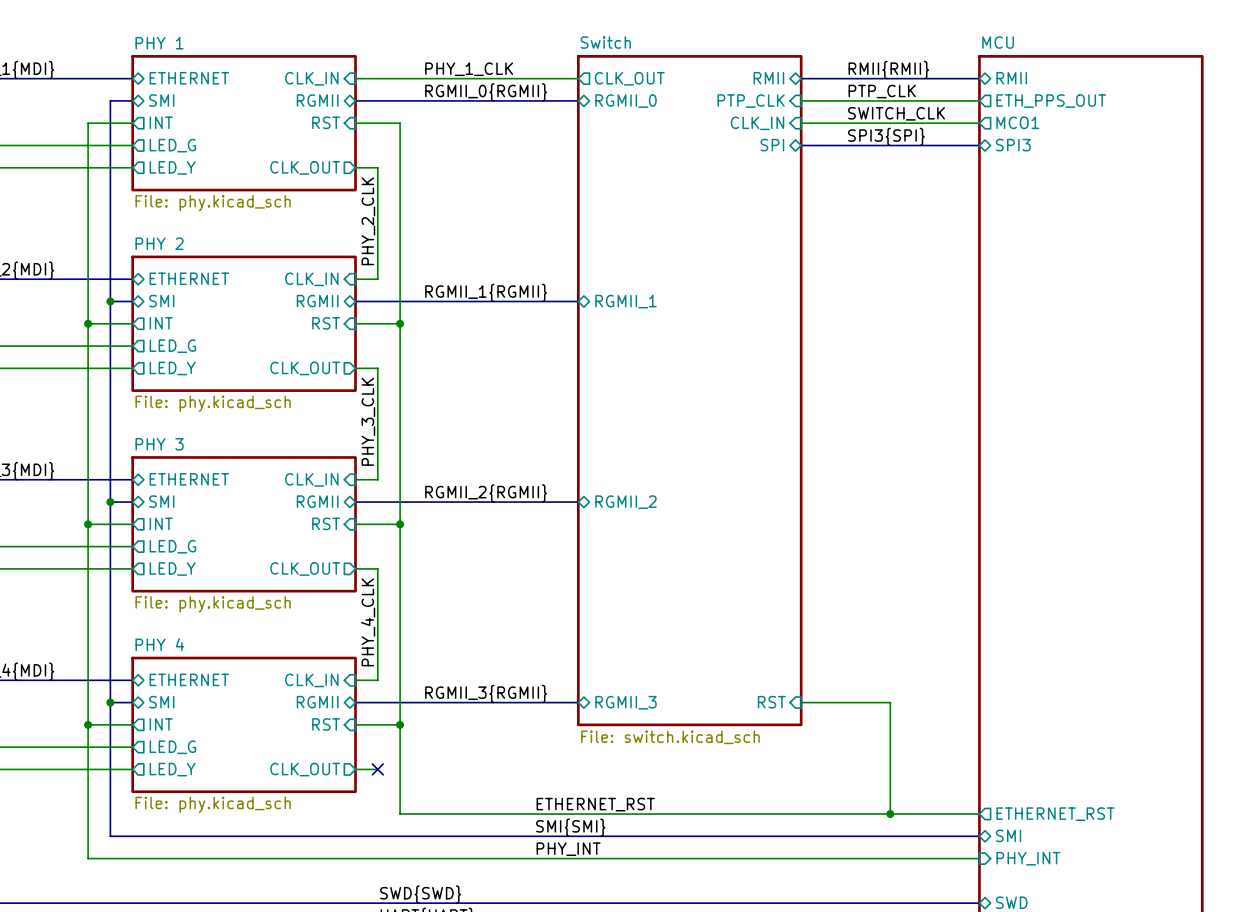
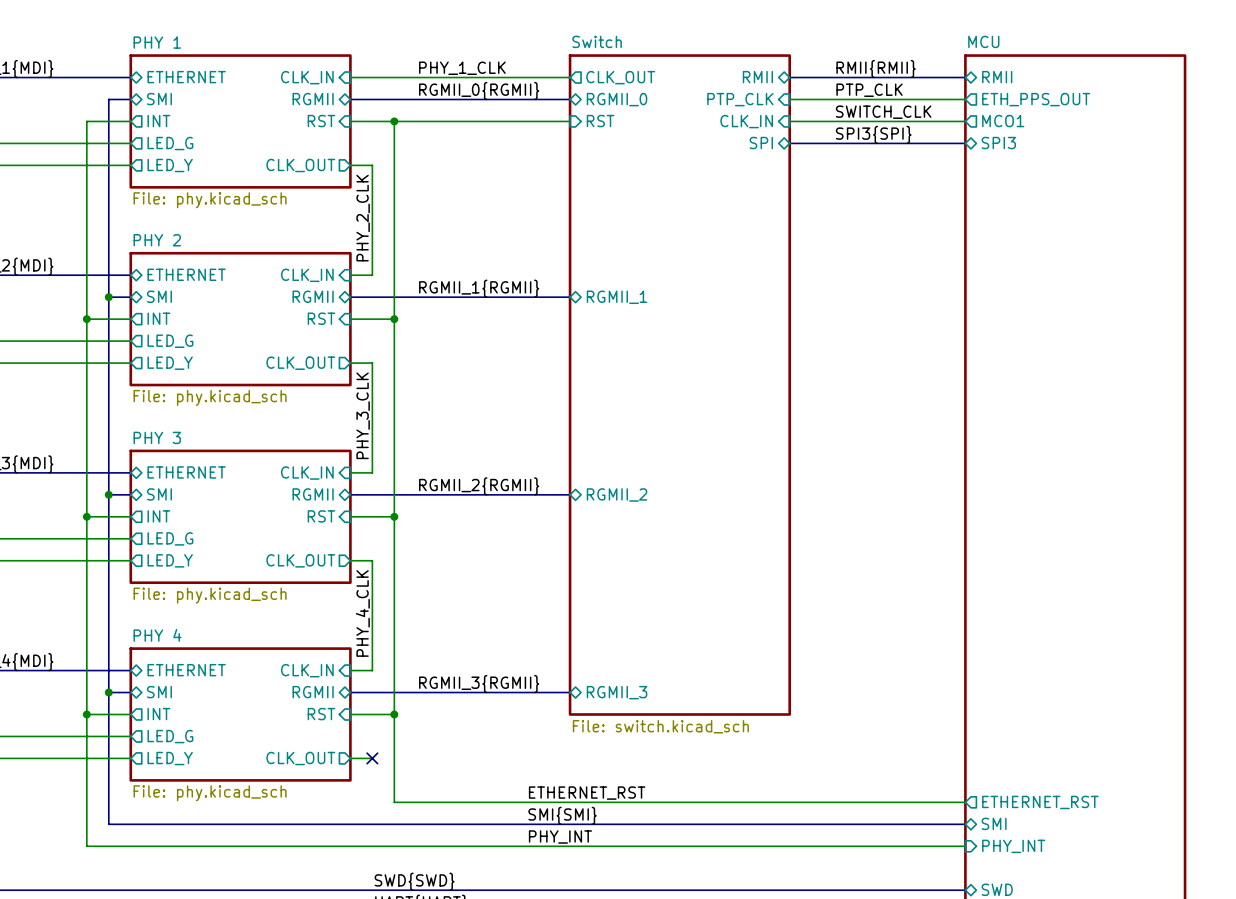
sheet pin: none -> RST (600, 121)
wire: none -> (394, 121) (570, 121)
junction: none -> (394, 121)
sheet pin: RST (771, 702) -> none
wire: (801, 702) (890, 702) (890, 814) -> none
junction: (890, 814) -> none

